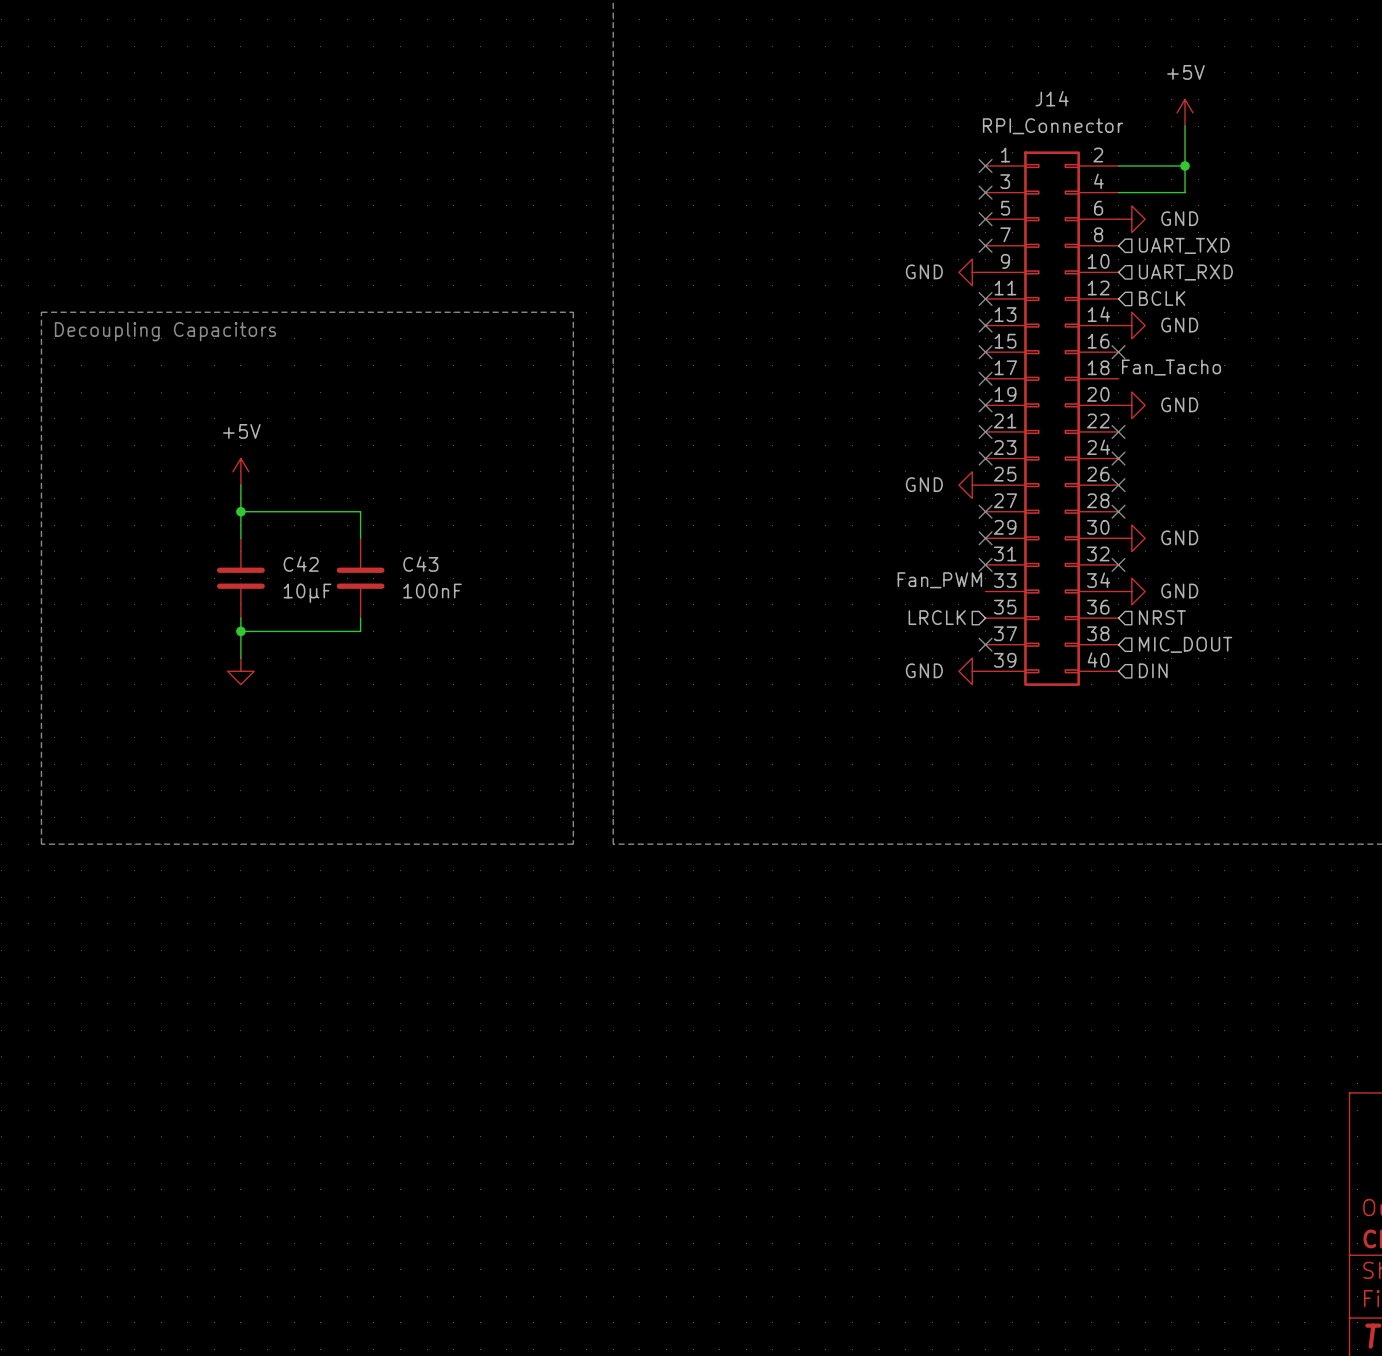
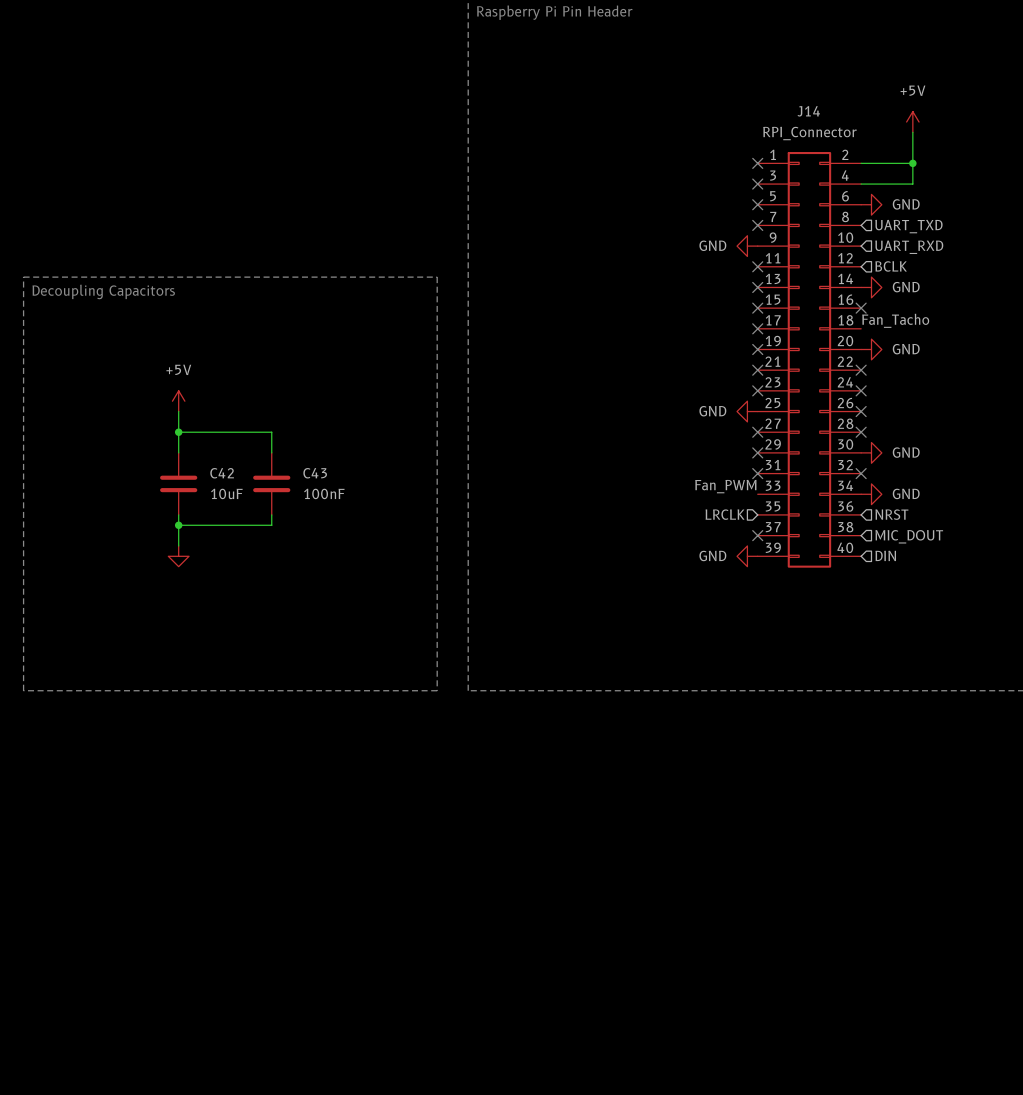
C42 value: 10µF (307, 593) -> 10uF (226, 493)

